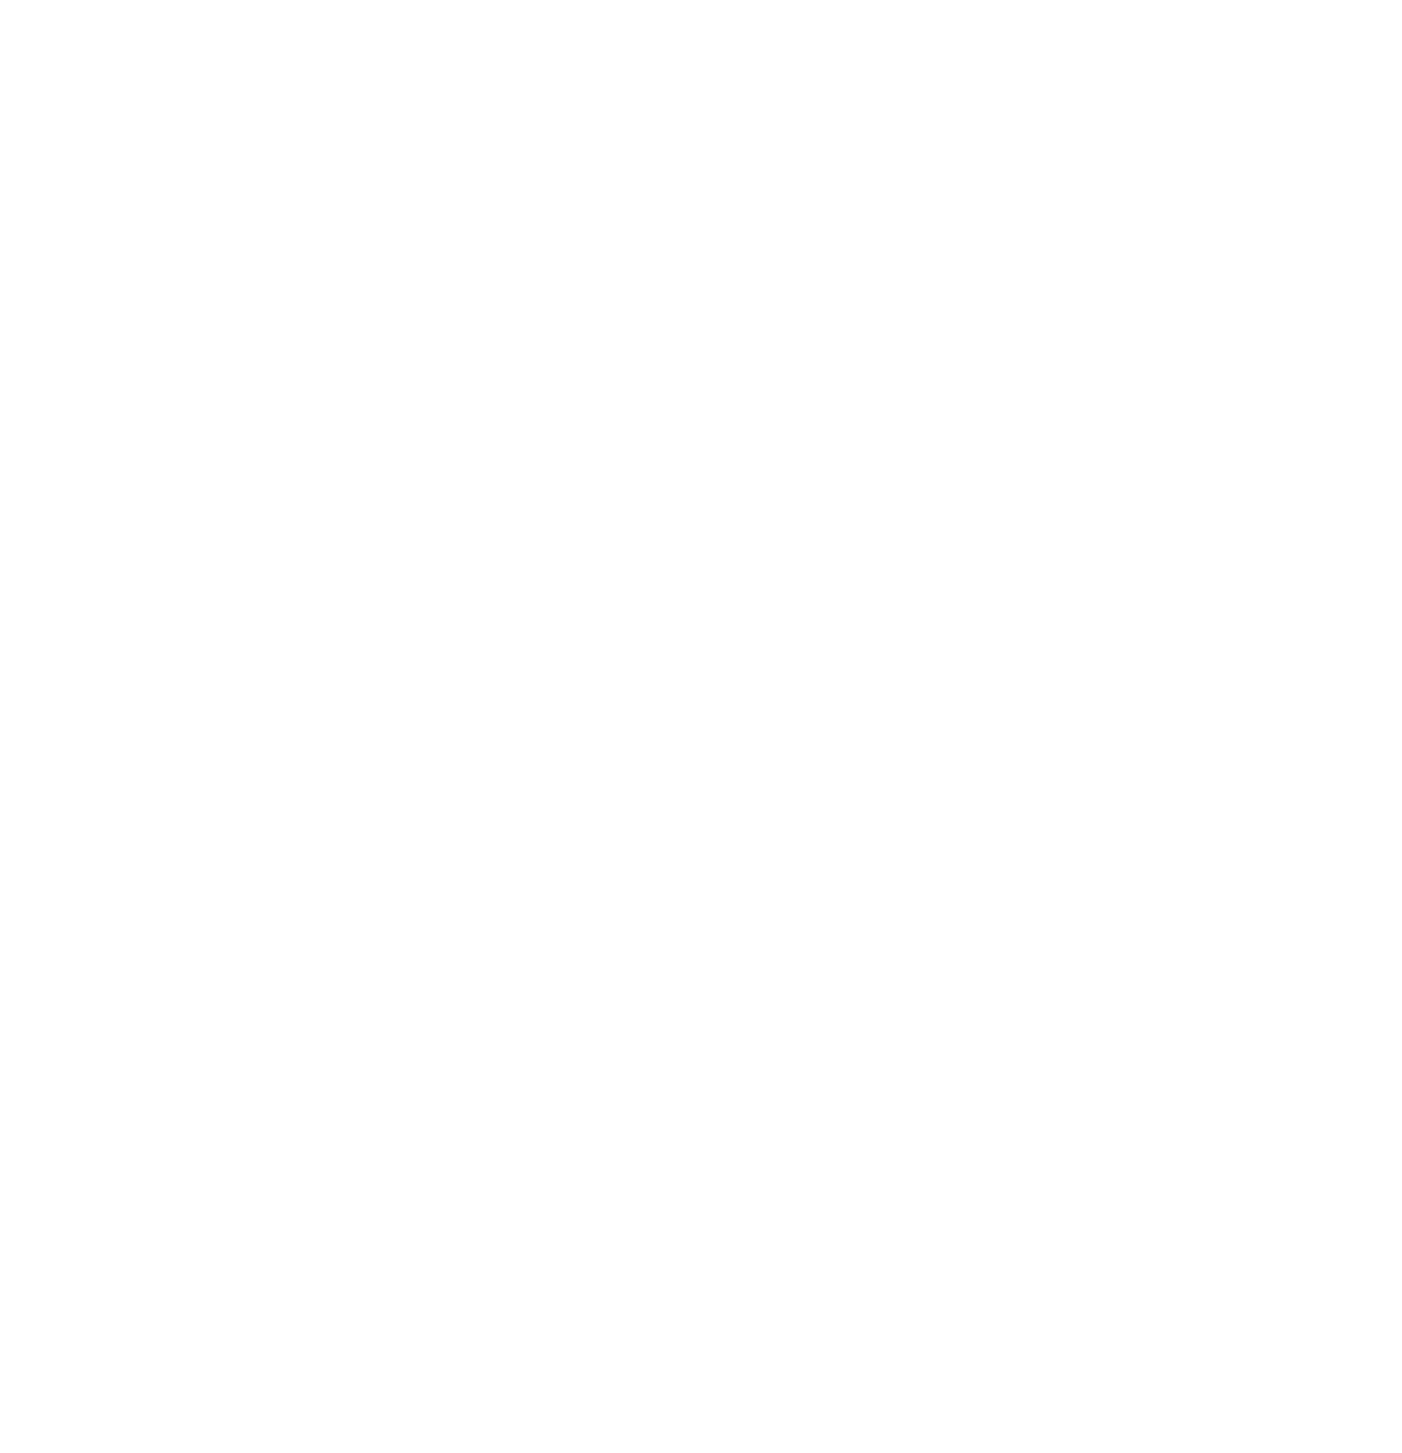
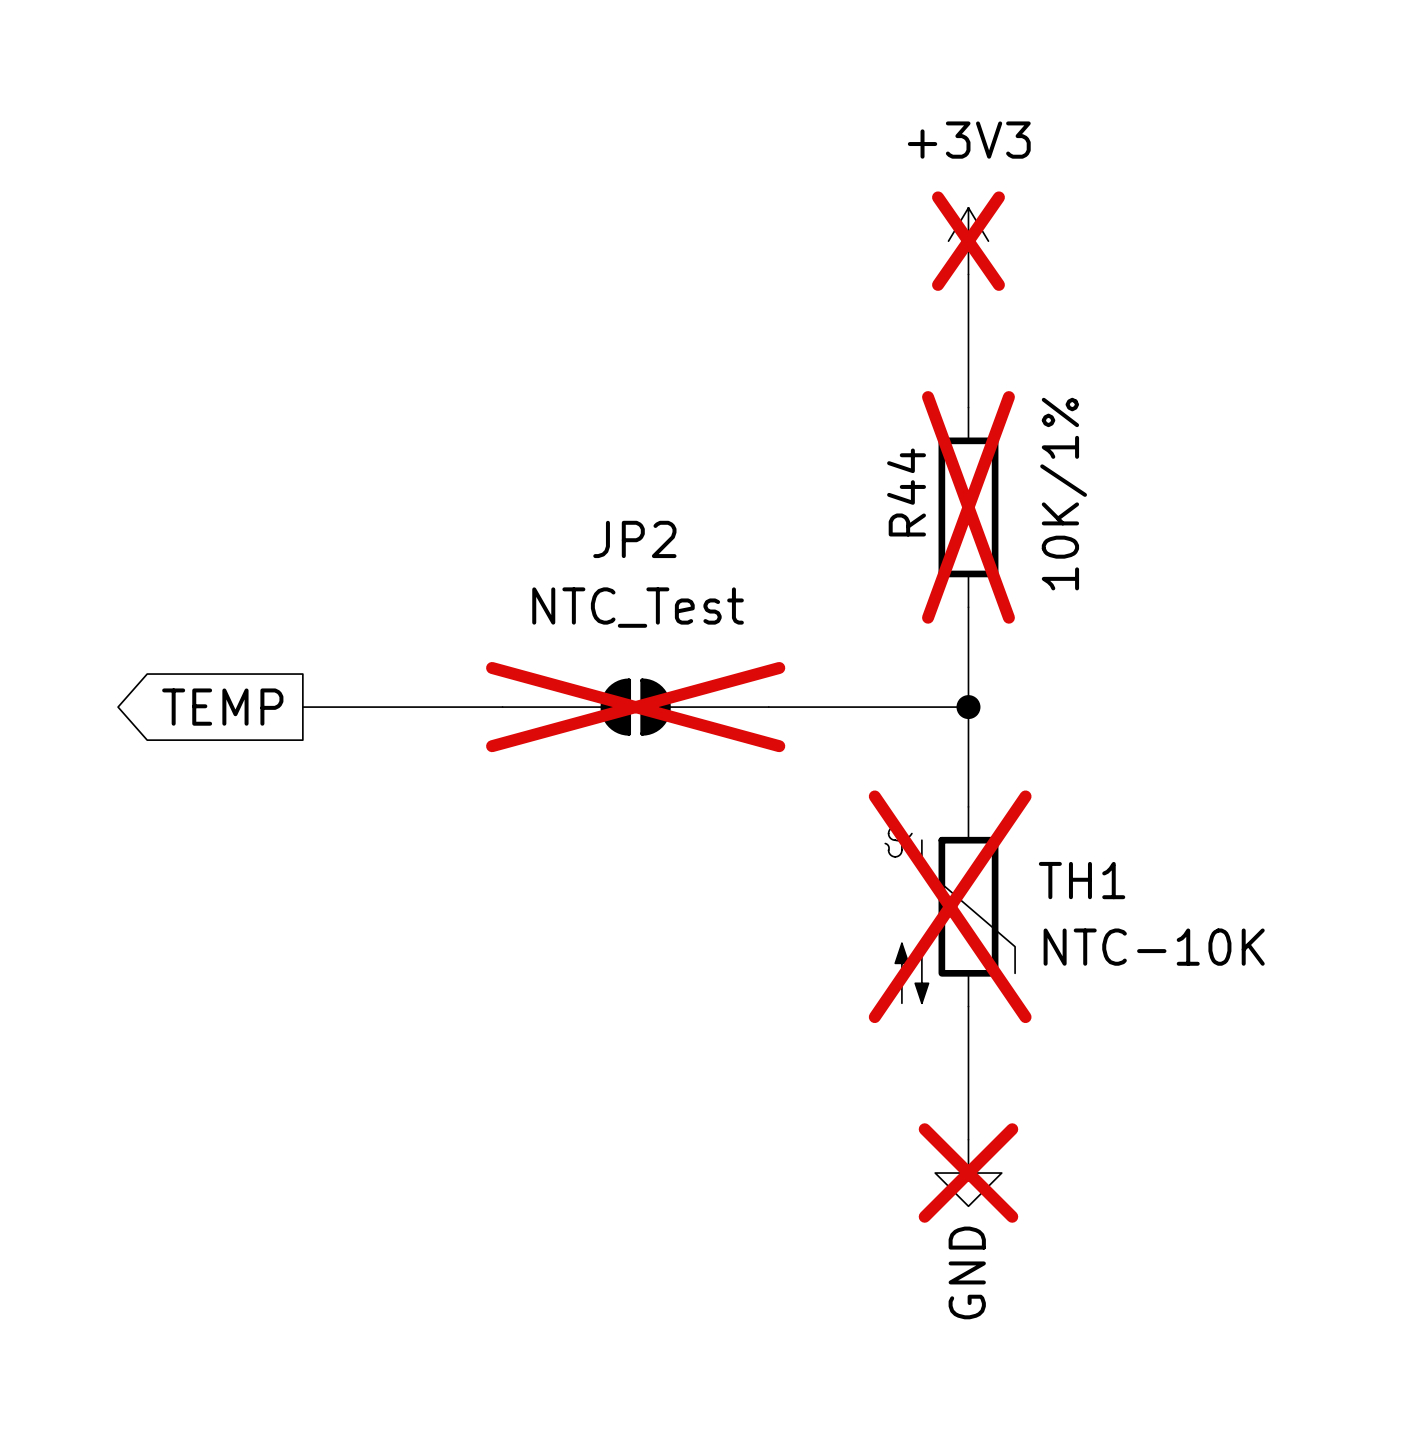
power symbol: none -> +3V3 (968, 241)
wire: none -> (968, 274) (968, 407)
R44: none -> 10K/1% (968, 507)
wire: none -> (968, 607) (968, 806)
global label: none -> TEMP (222, 707)
wire: none -> (302, 707) (502, 707)
JP2: none -> NTC_Test (635, 707)
wire: none -> (768, 707) (968, 707)
junction: none -> (968, 707)
TH1: none -> NTC-10K (950, 906)
wire: none -> (968, 1006) (968, 1139)
power symbol: none -> GND (968, 1173)

